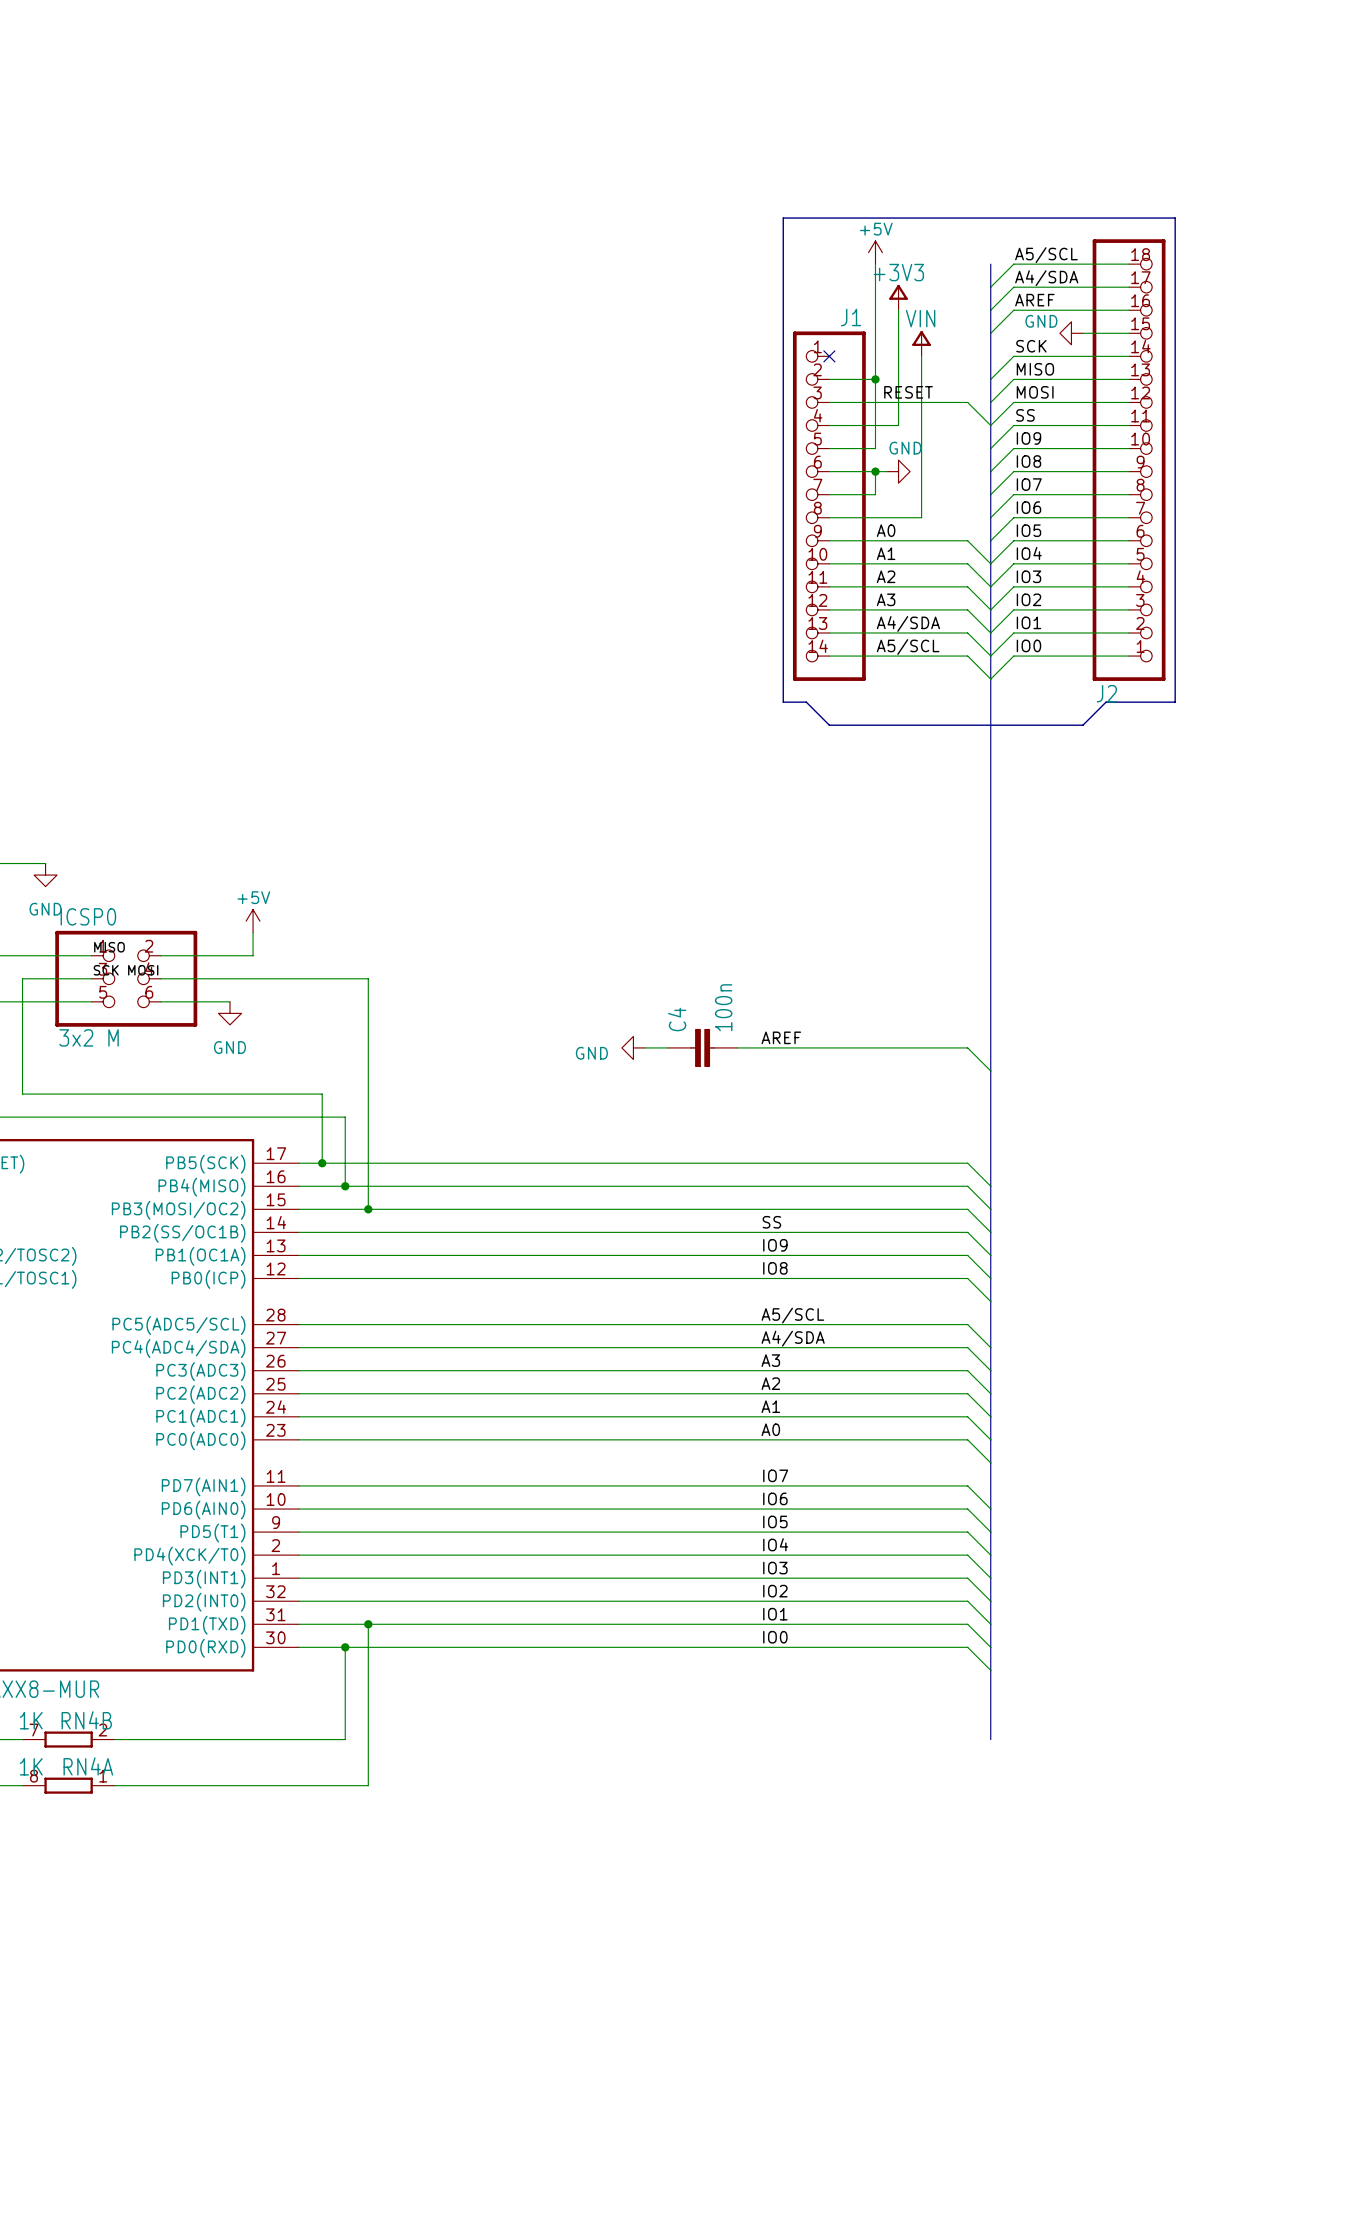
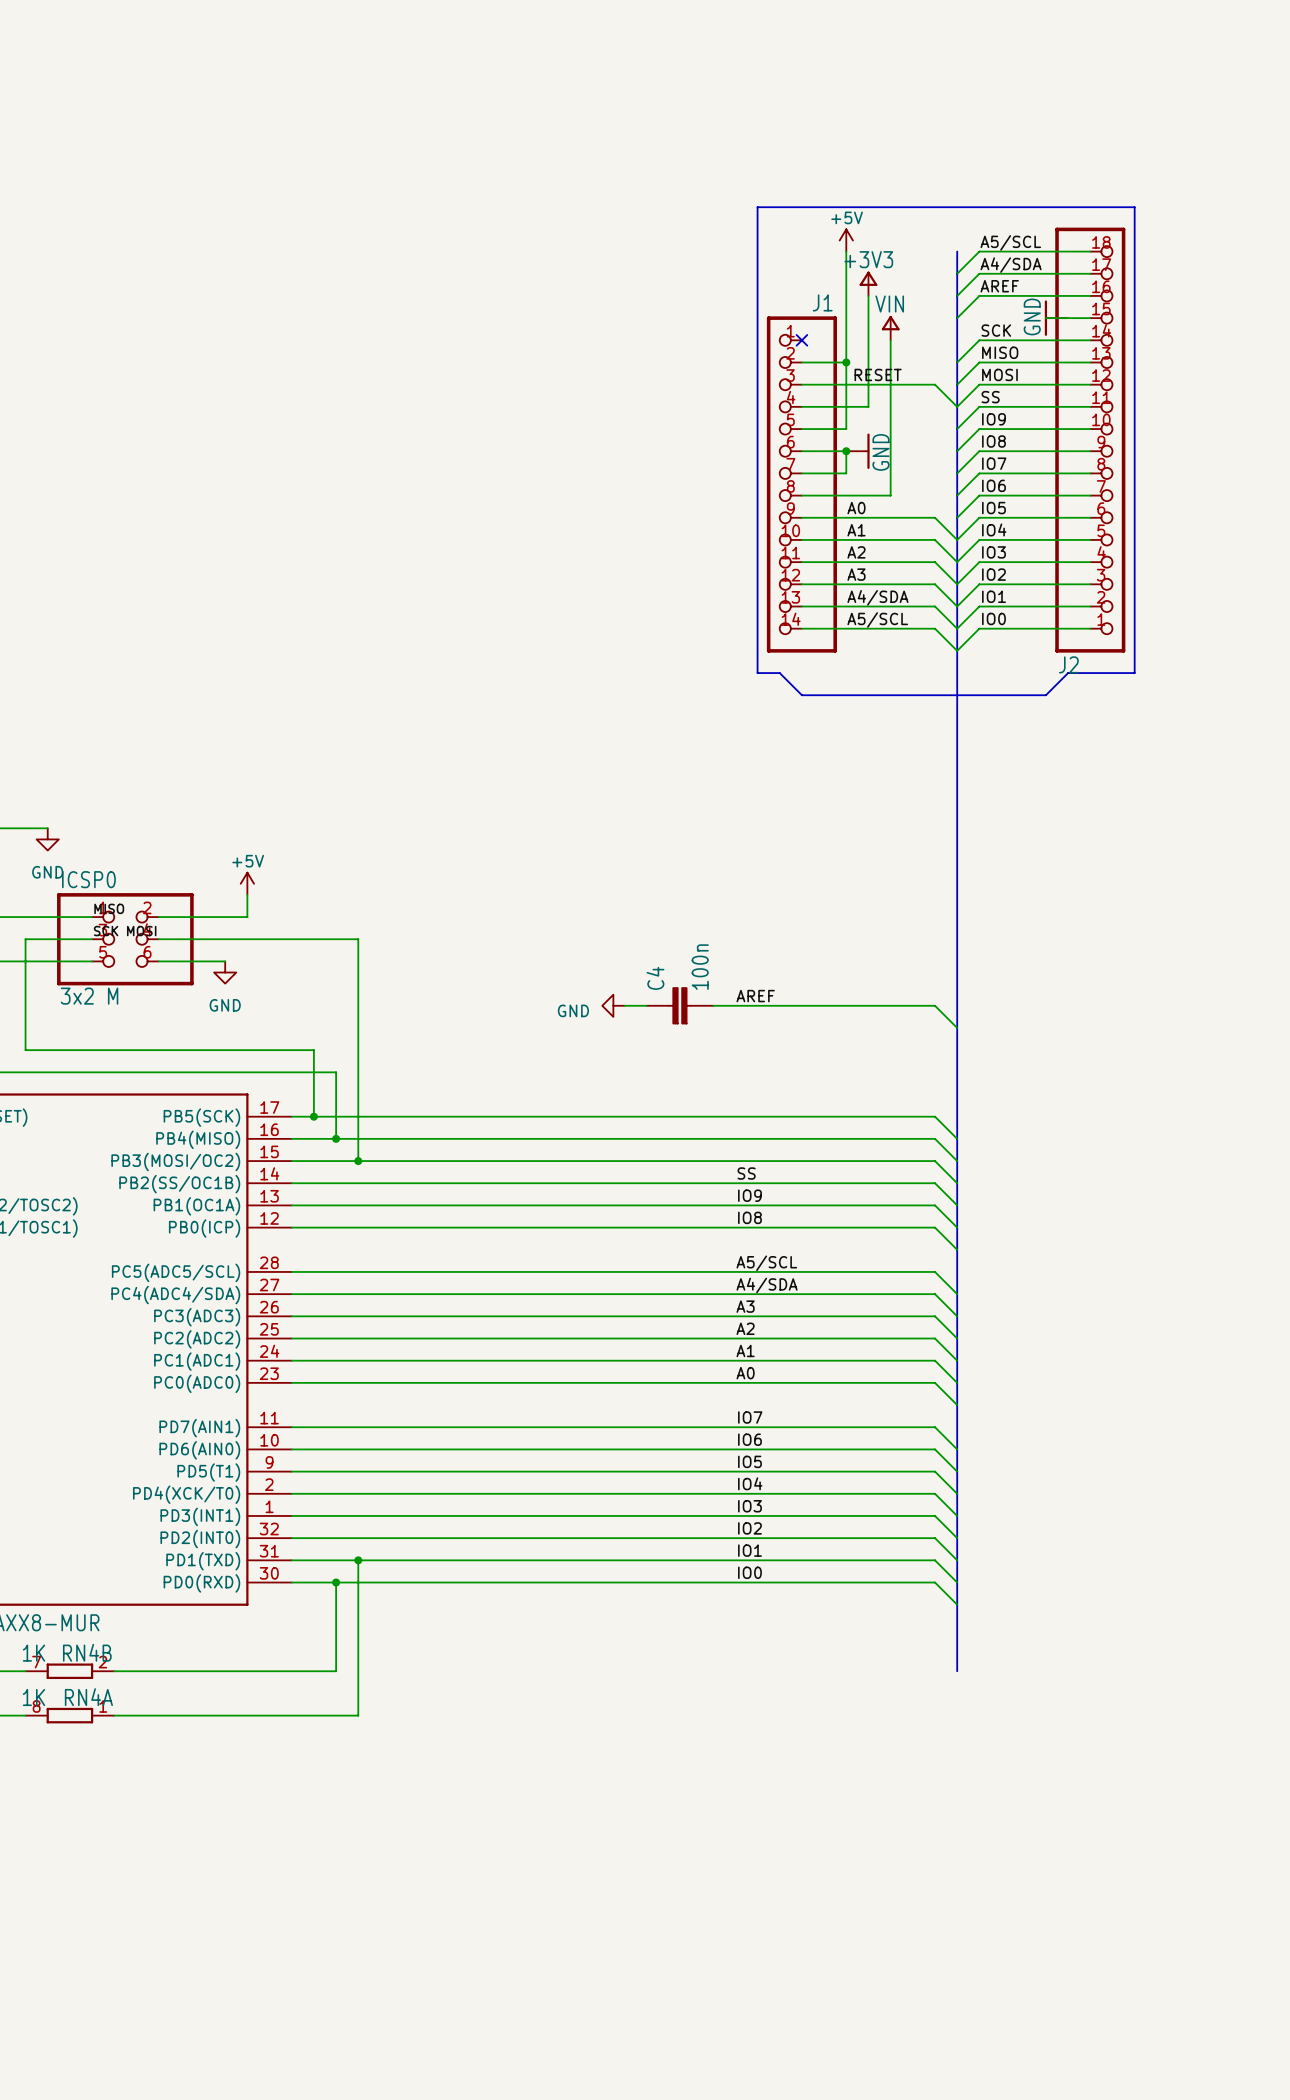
power symbol: GND (1071, 333) -> none
power symbol: none -> GND (1056, 318)
power symbol: none -> GND (857, 451)
power symbol: GND (898, 471) -> none

